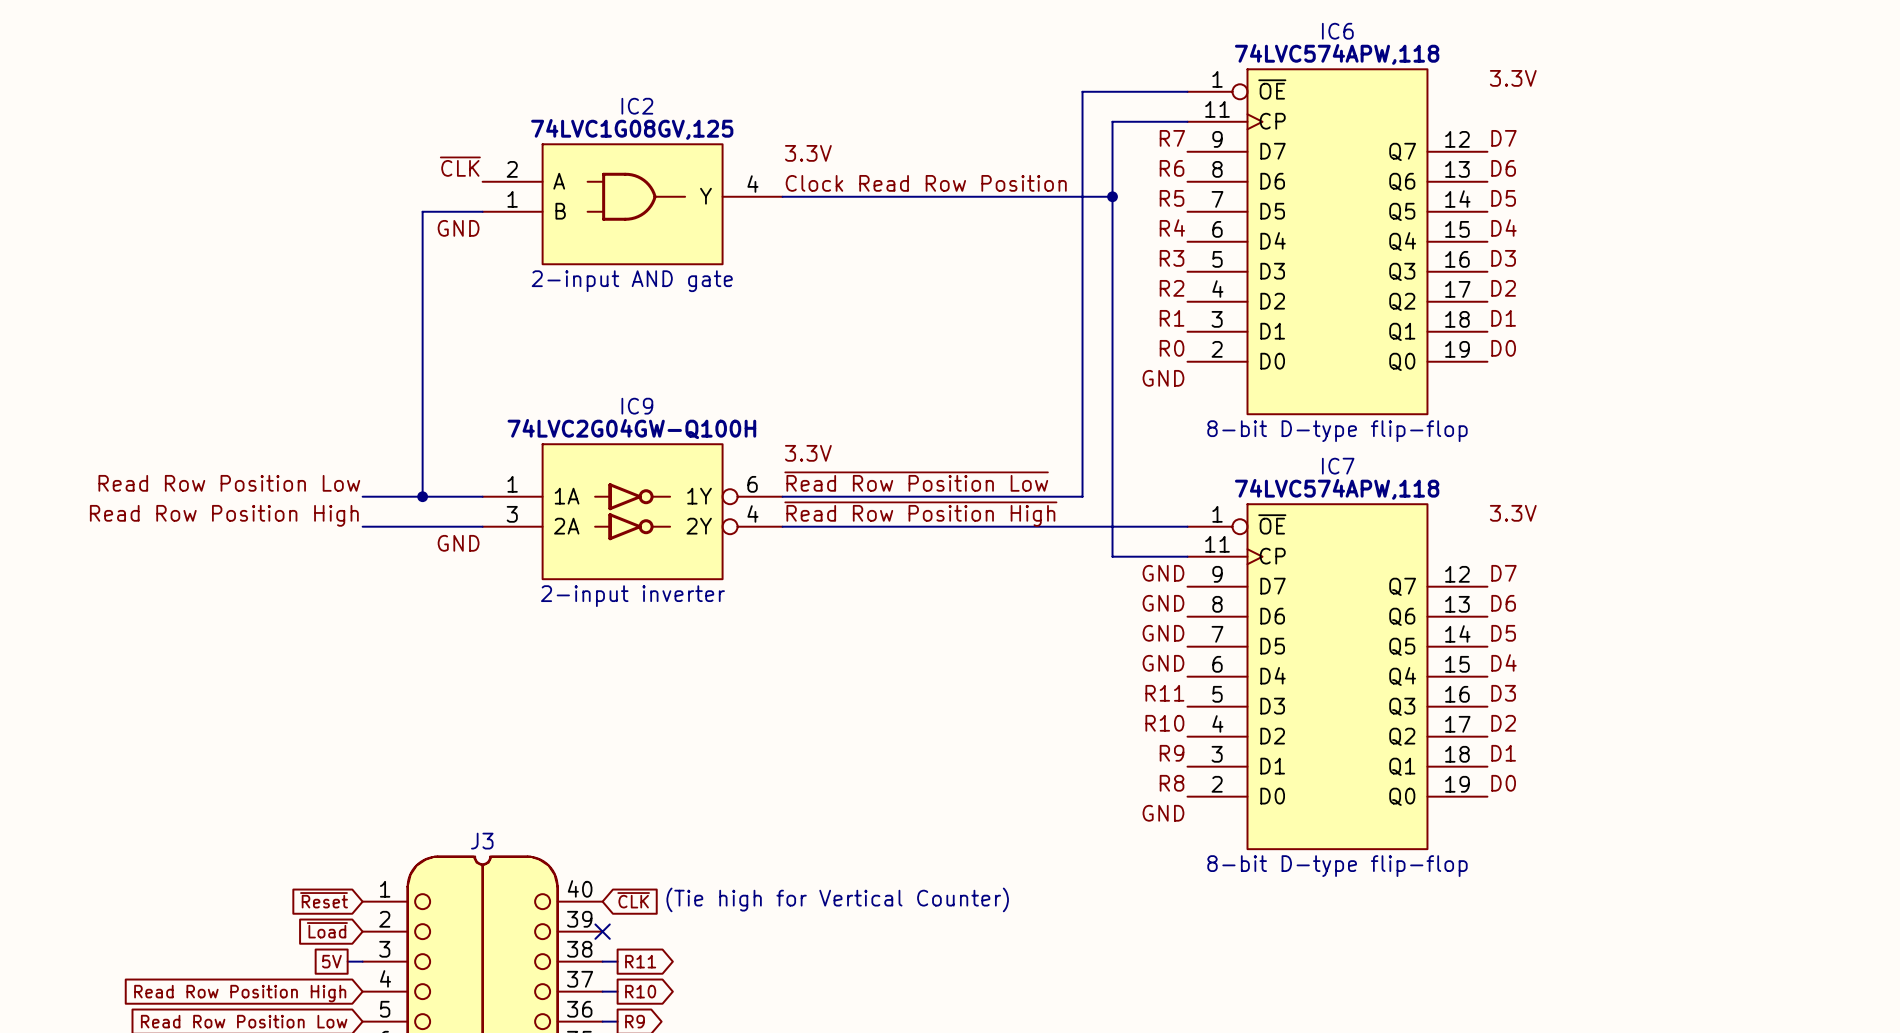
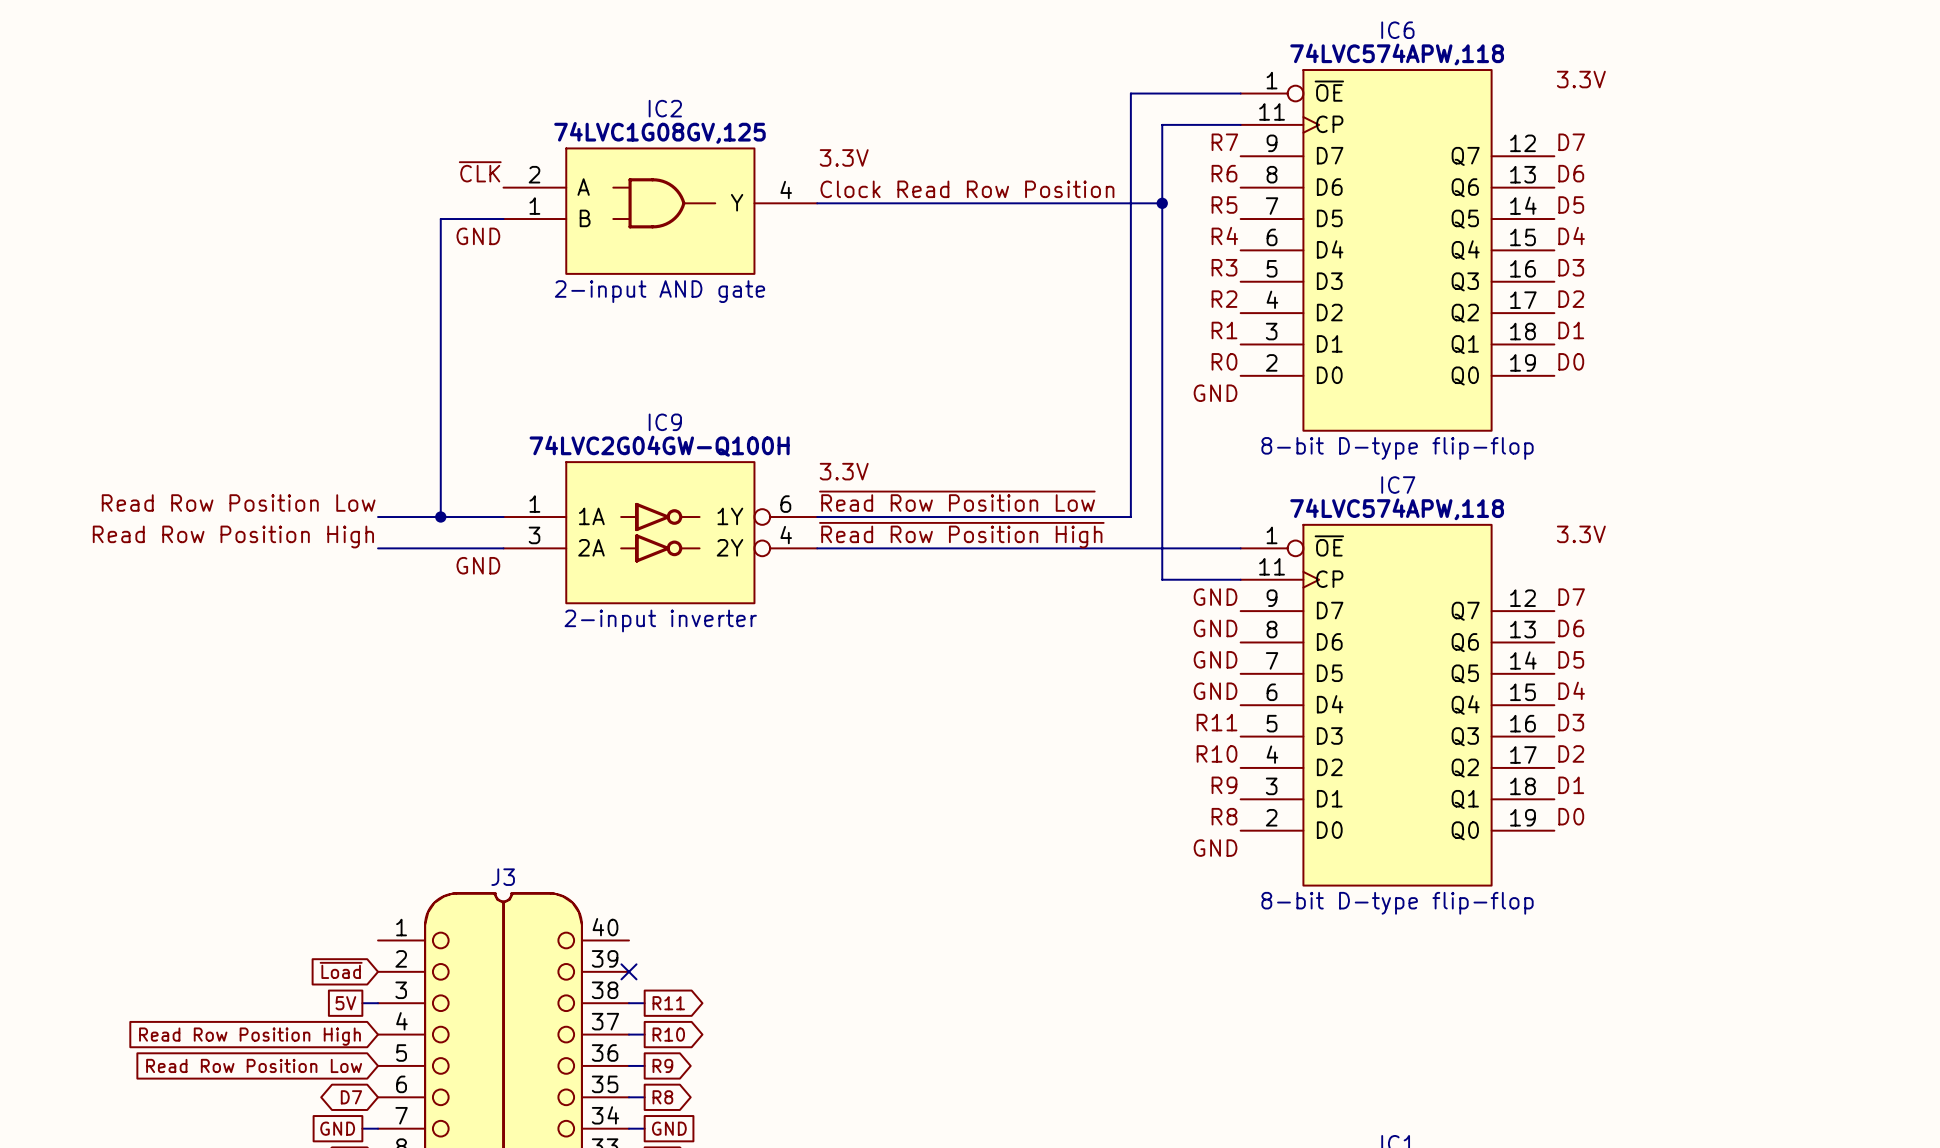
text: (Tie high for Vertical Counter) (837, 899) -> none
global label: ~{Reset} (324, 900) -> none
global label: ~{CLK} (633, 900) -> none

